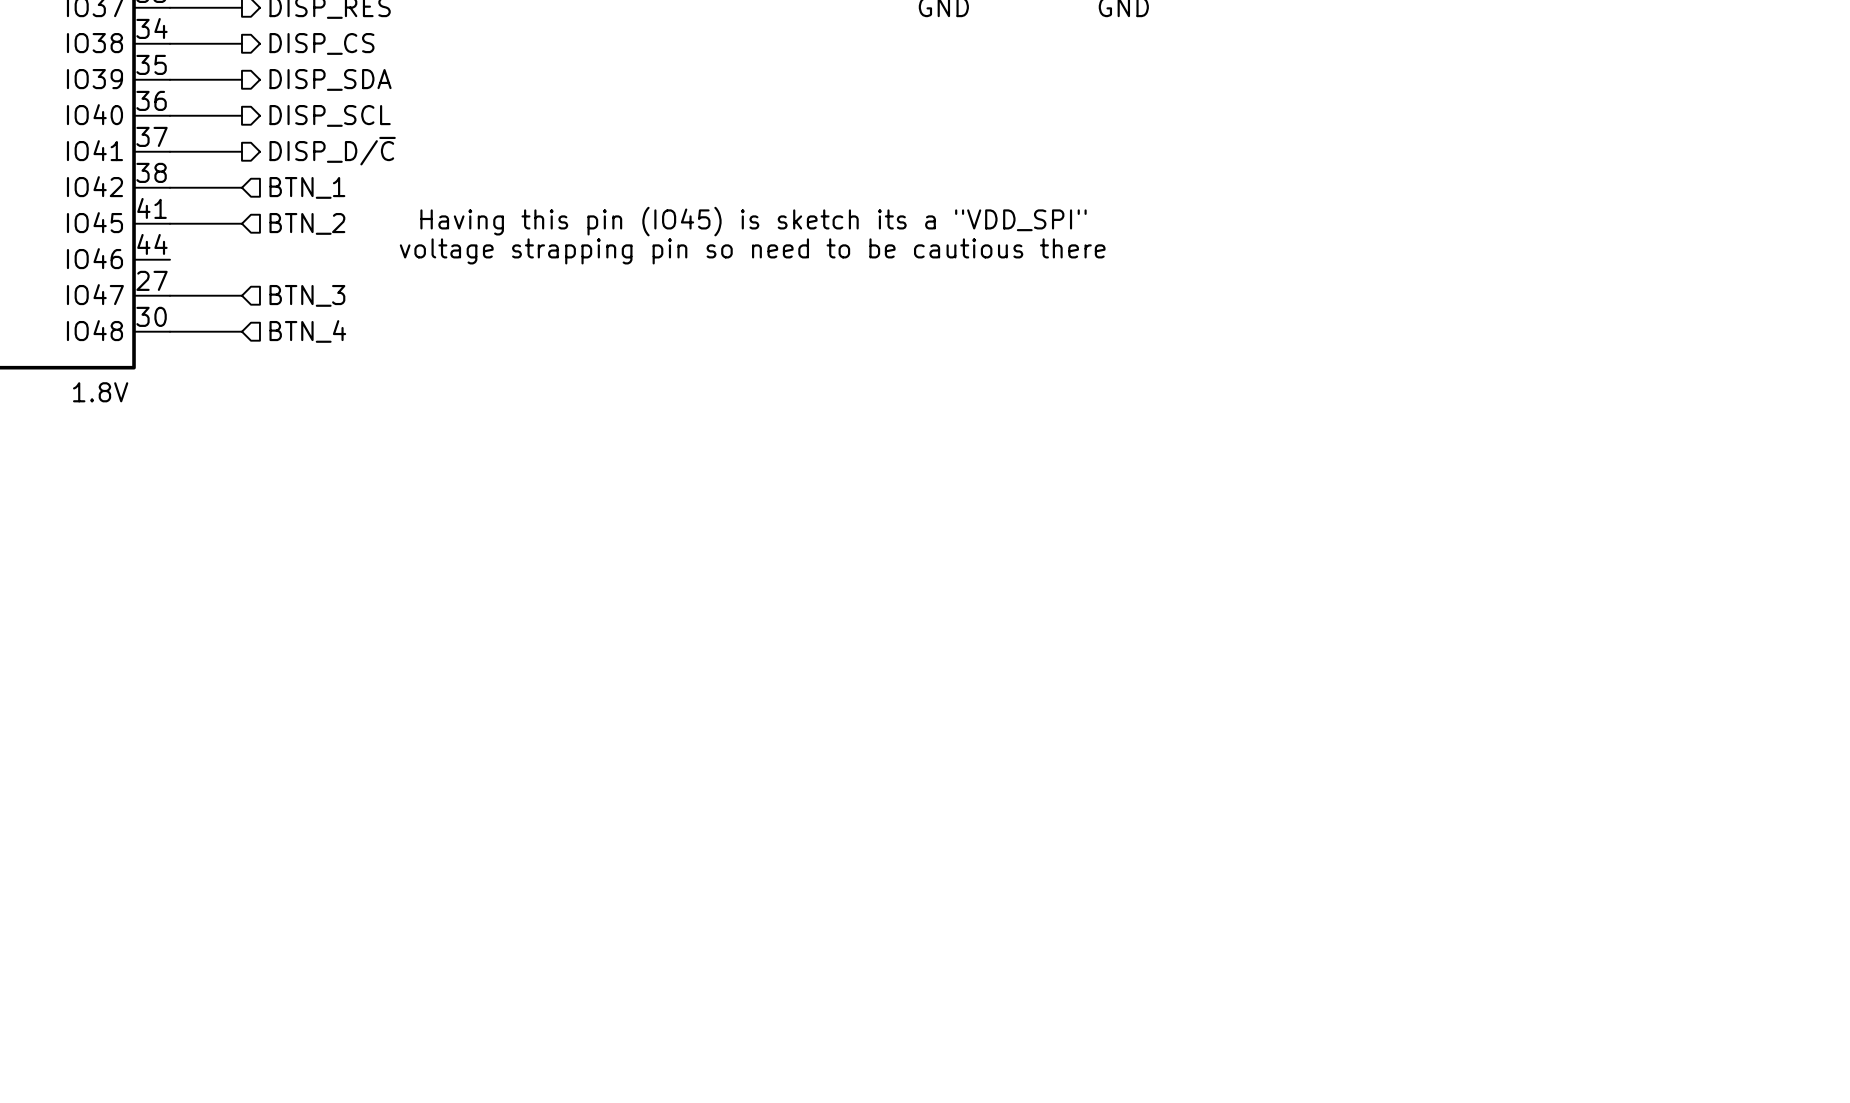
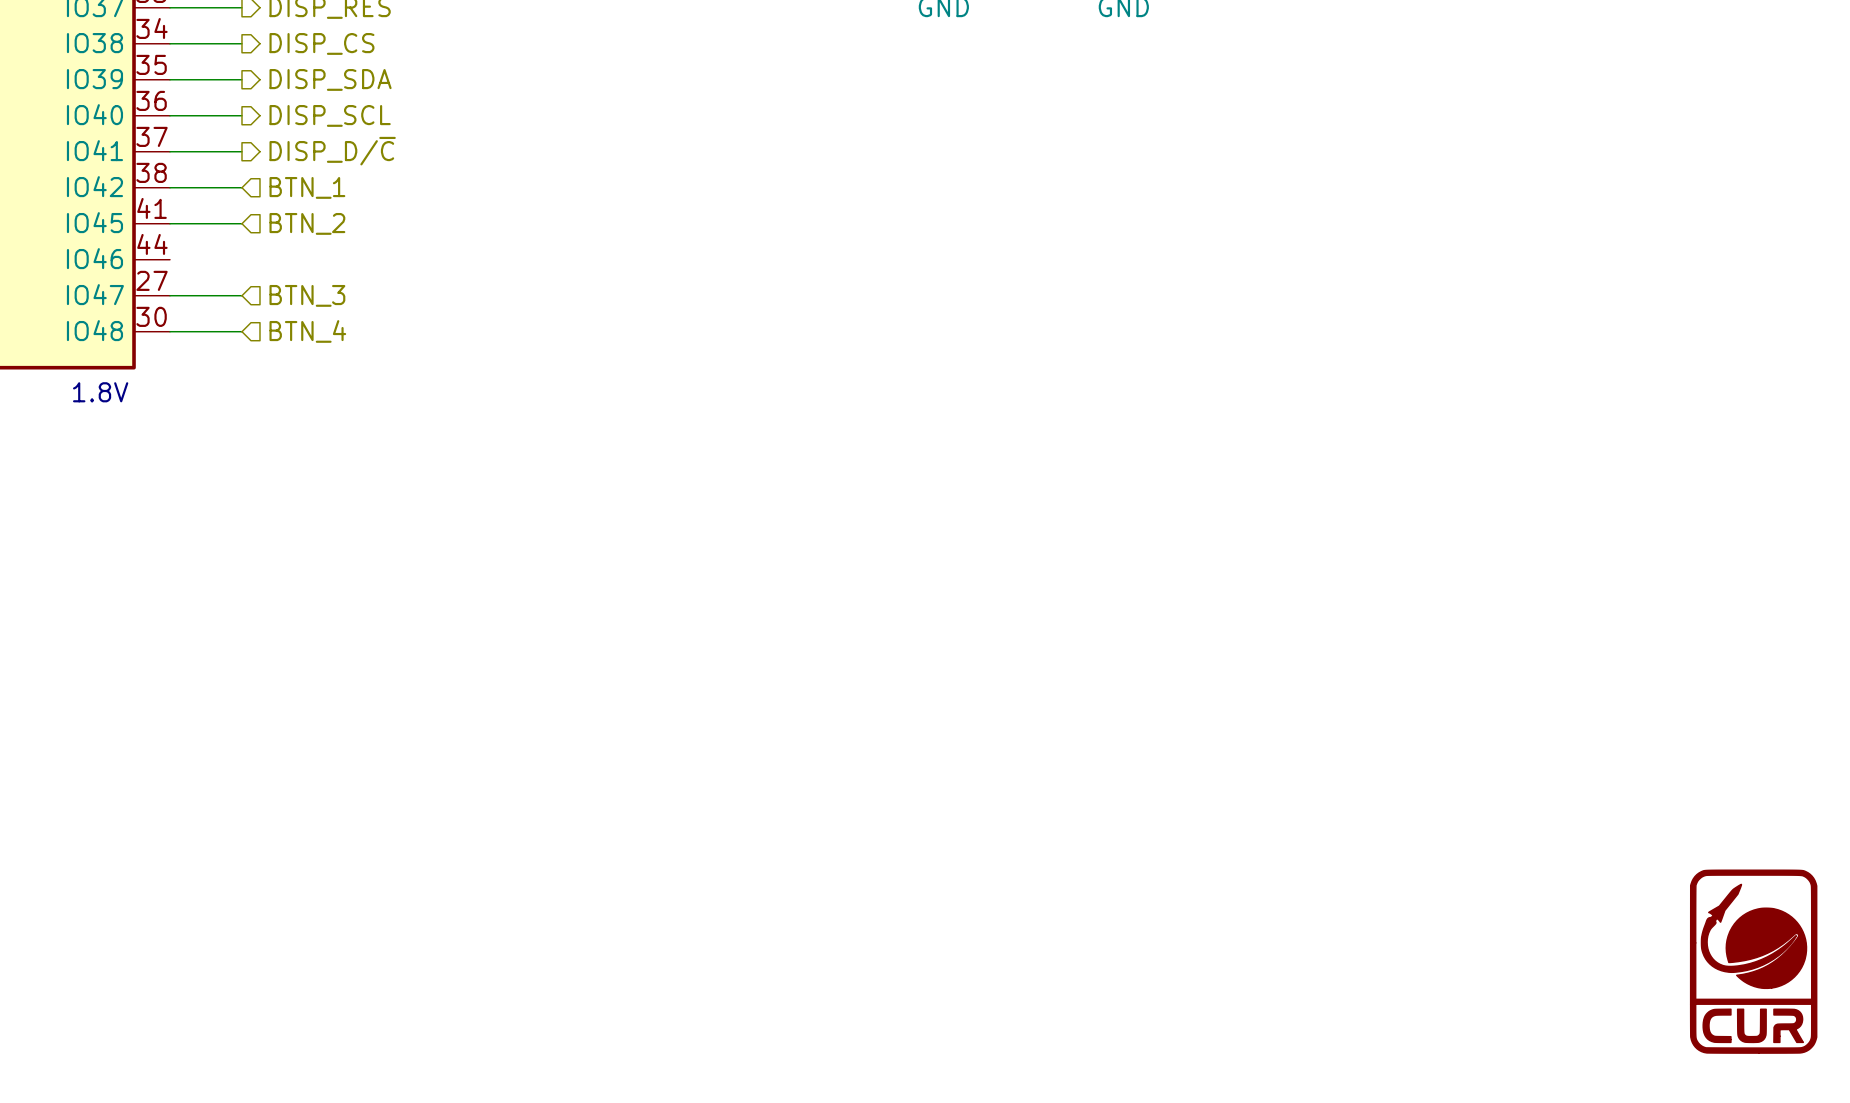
text: Having this pin (IO45) is sketch its a "VDD_SPI" (753, 221) -> none
text: voltage strapping pin so need to be cautious there (752, 251) -> none
power symbol: none -> (1753, 961)

